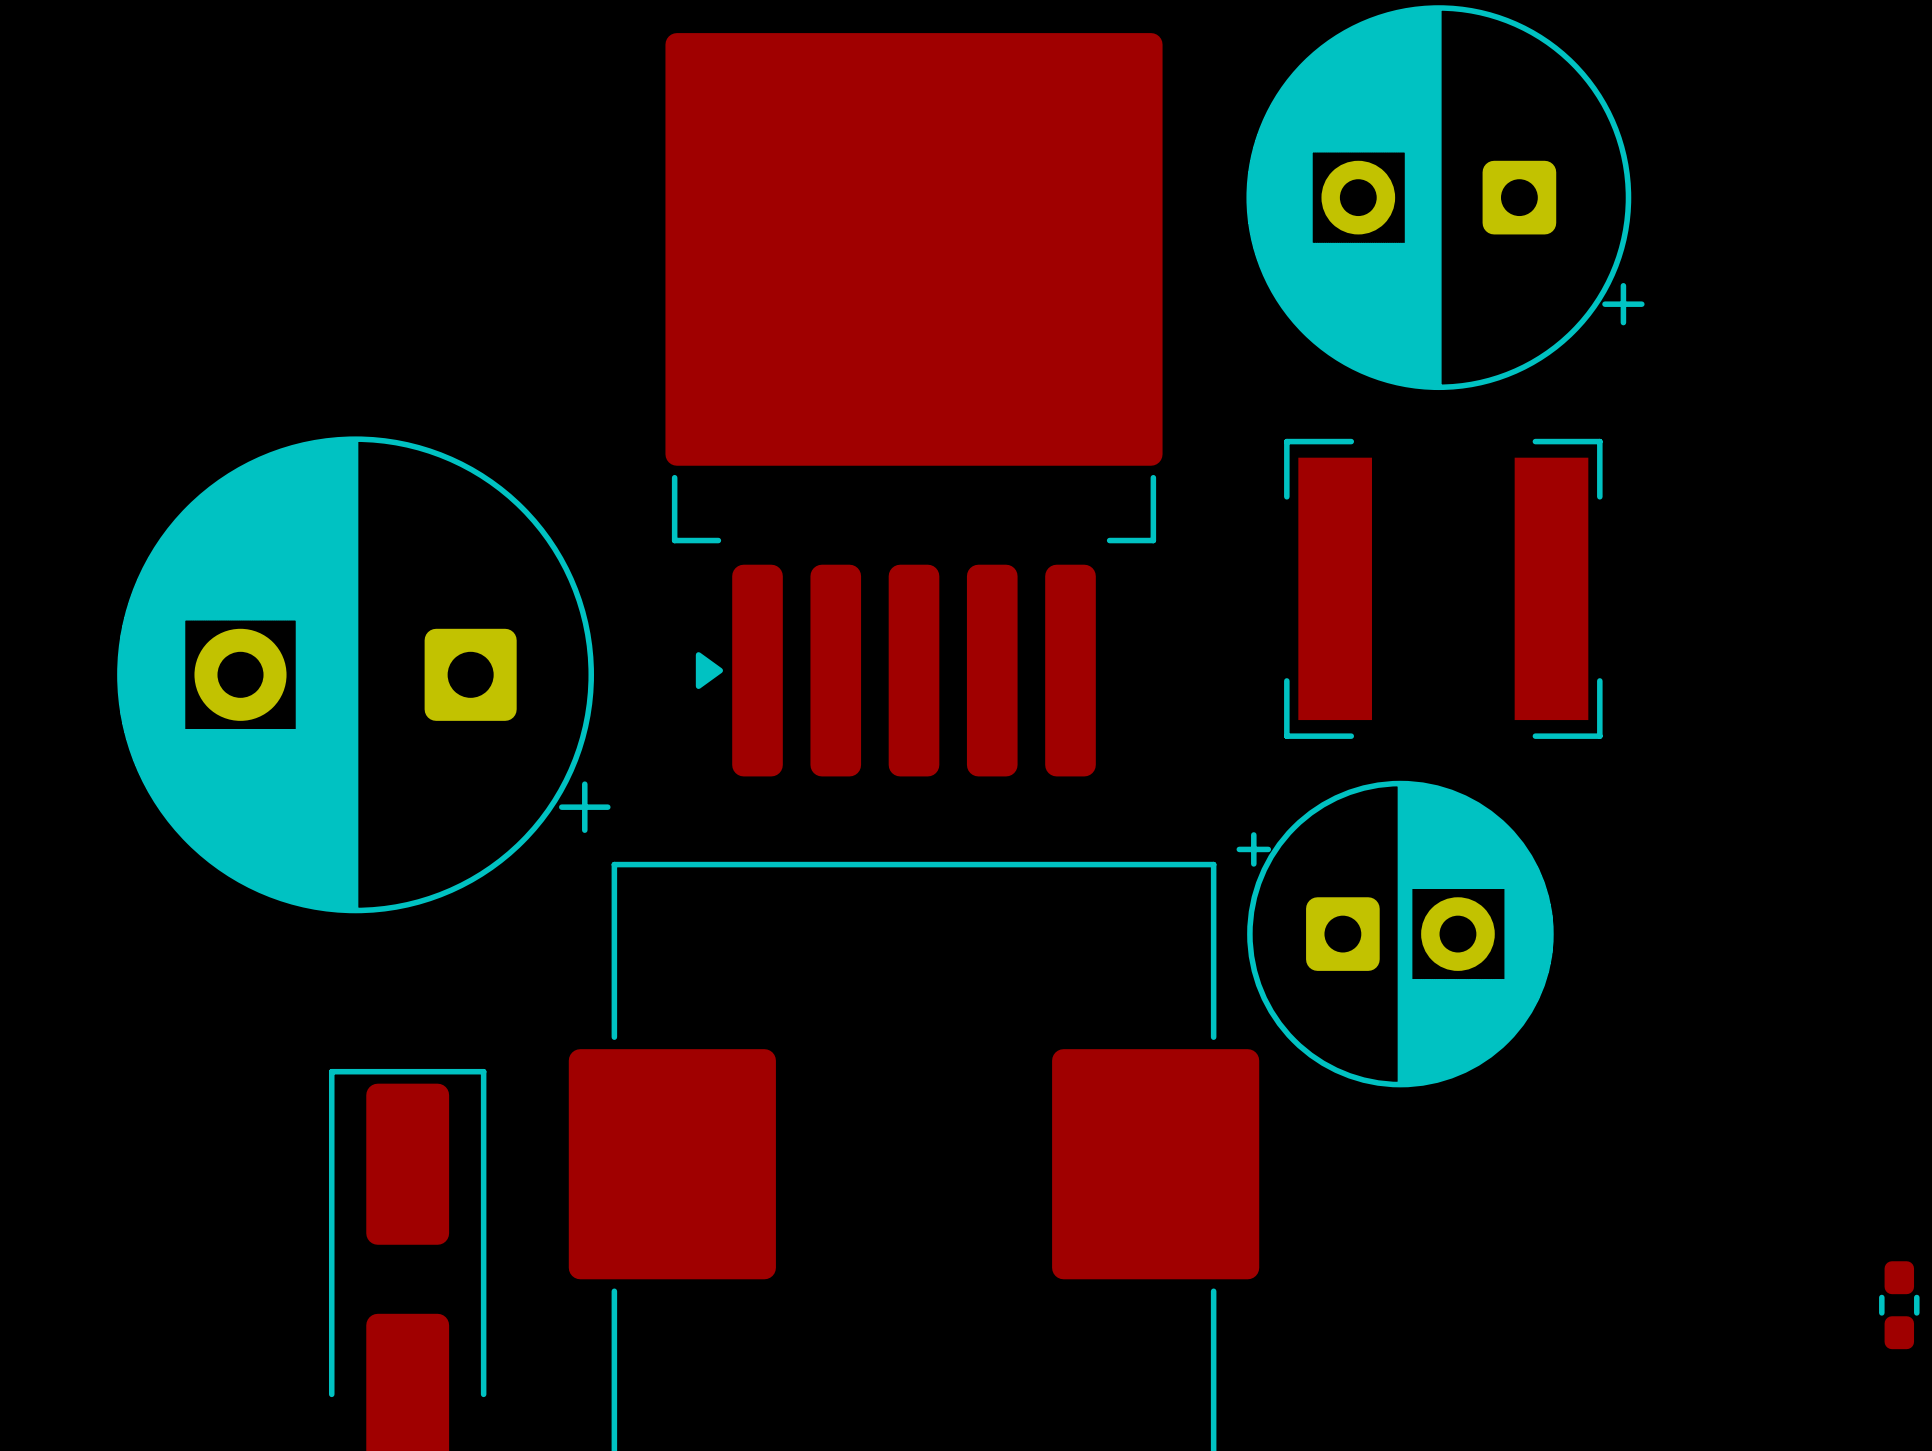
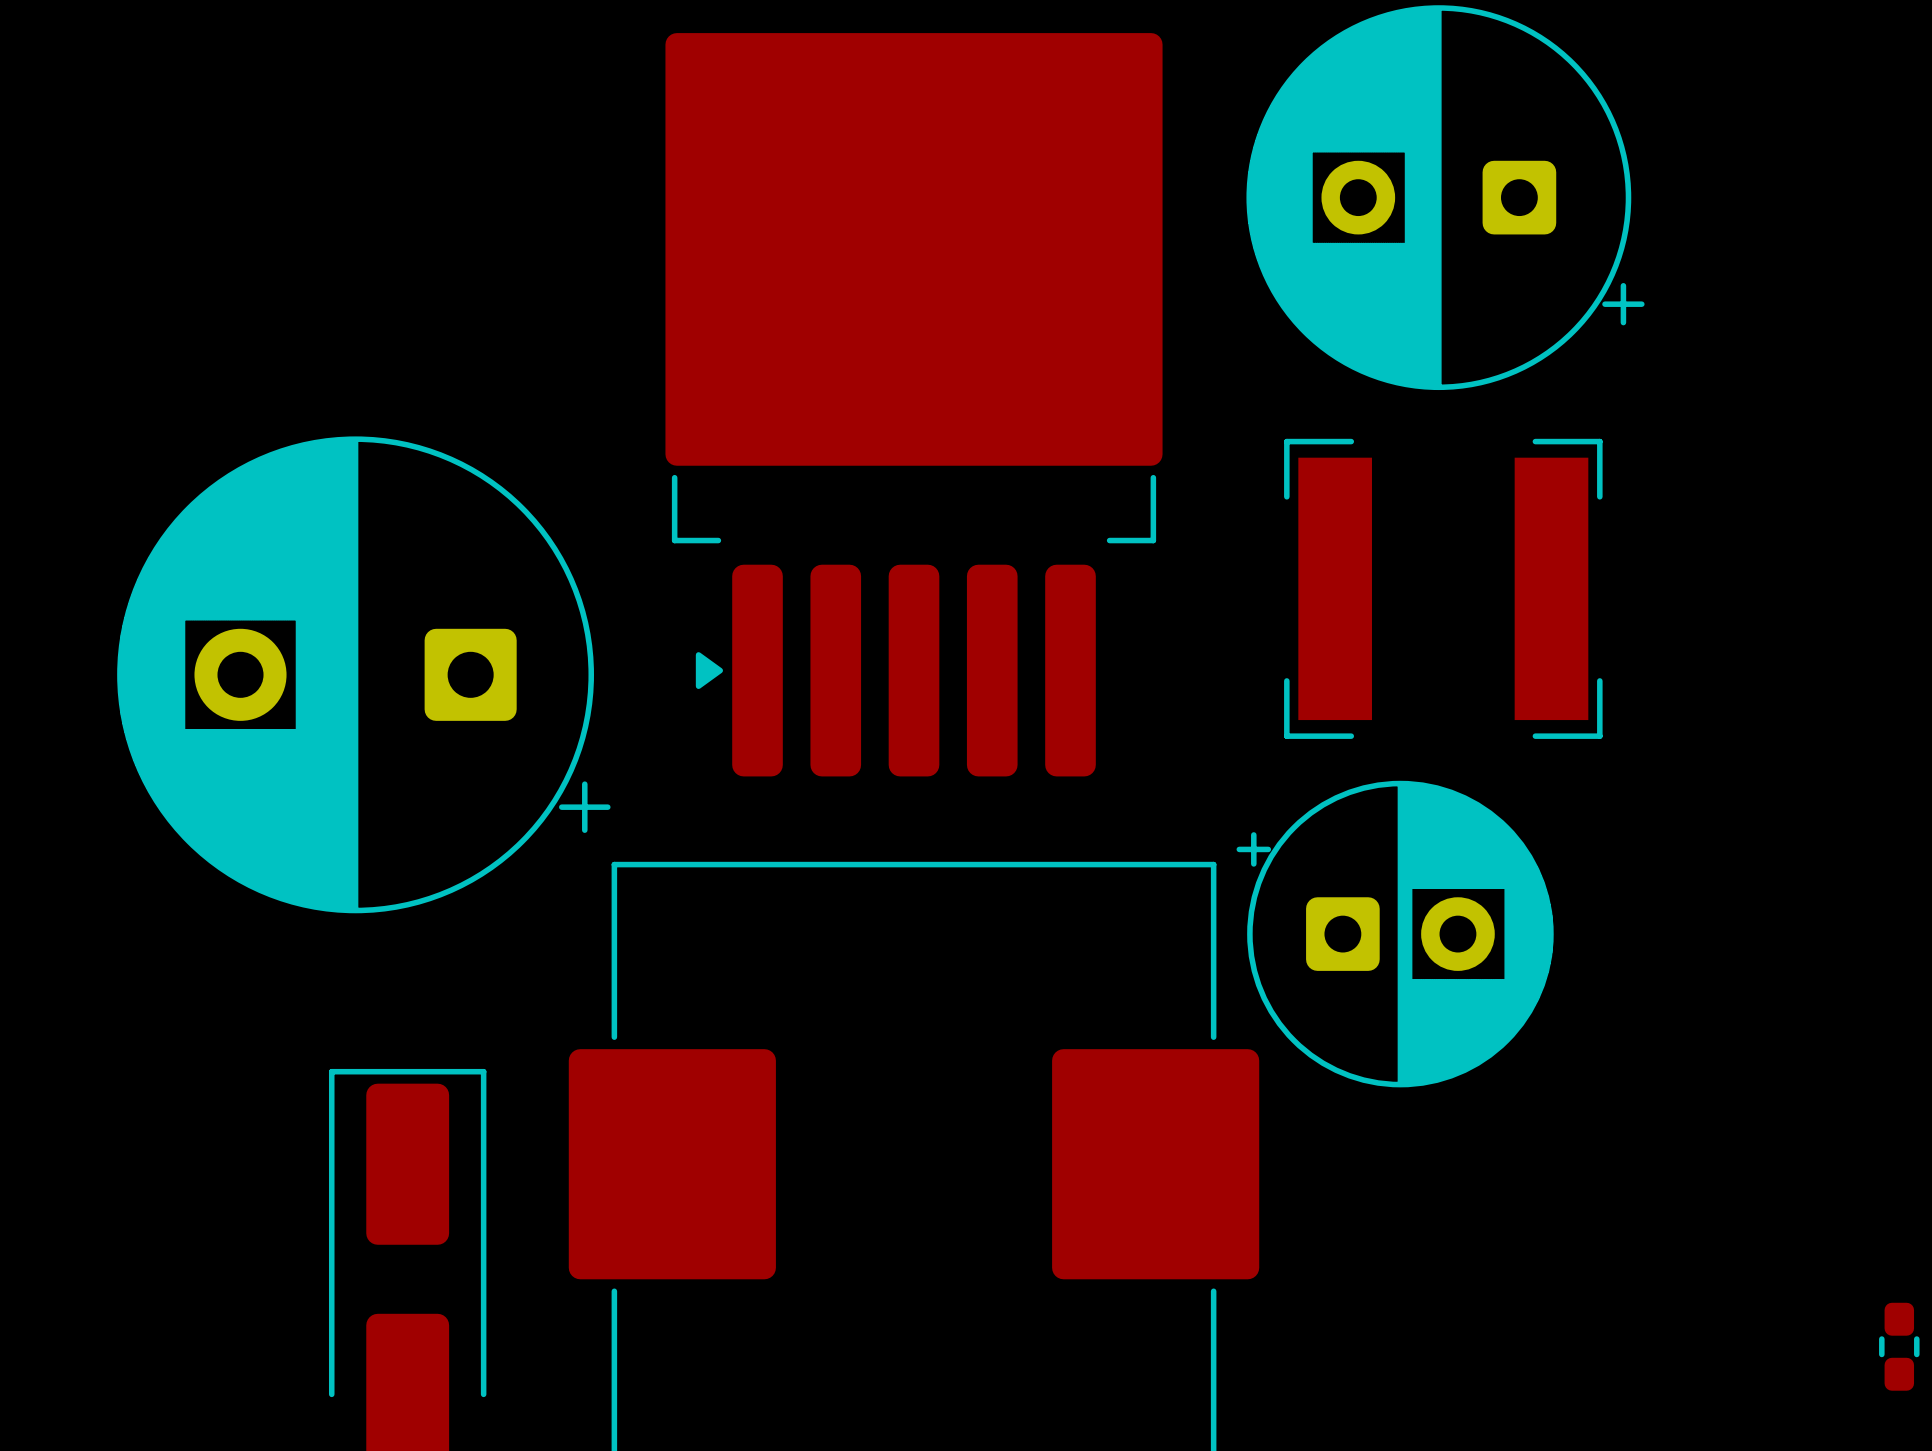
part position: (1899, 1305) -> (1899, 1346)

